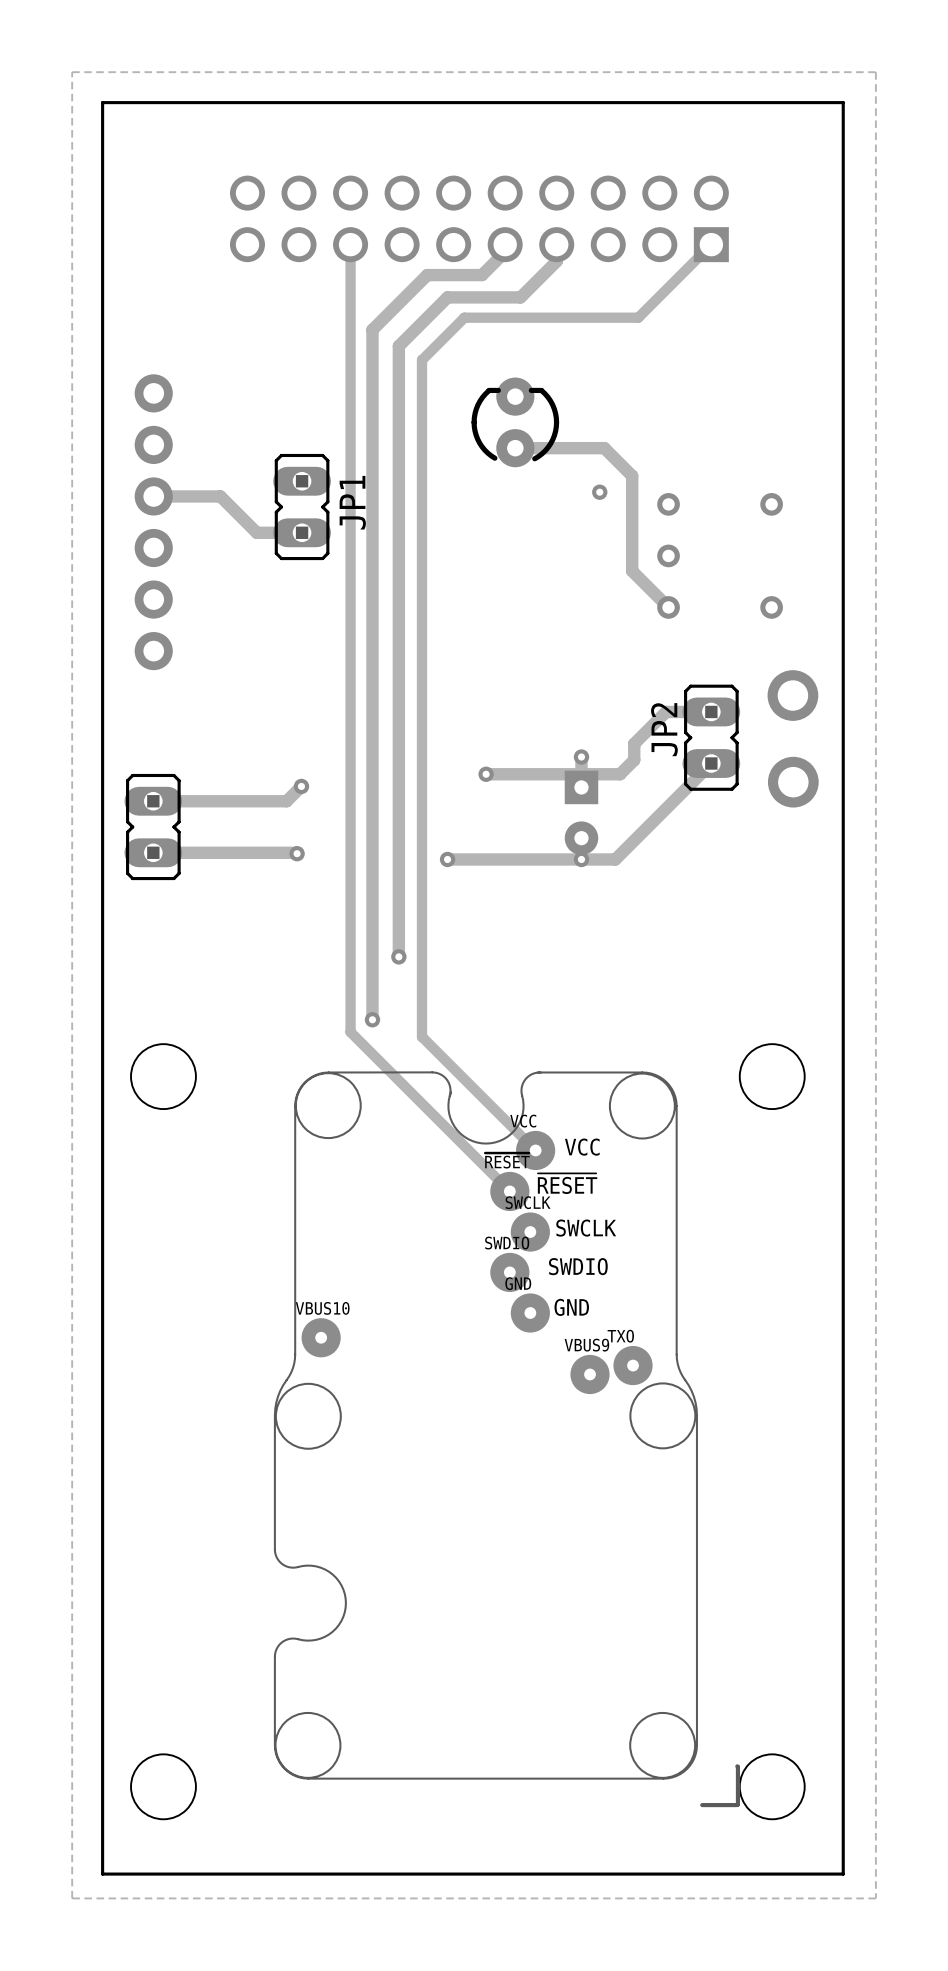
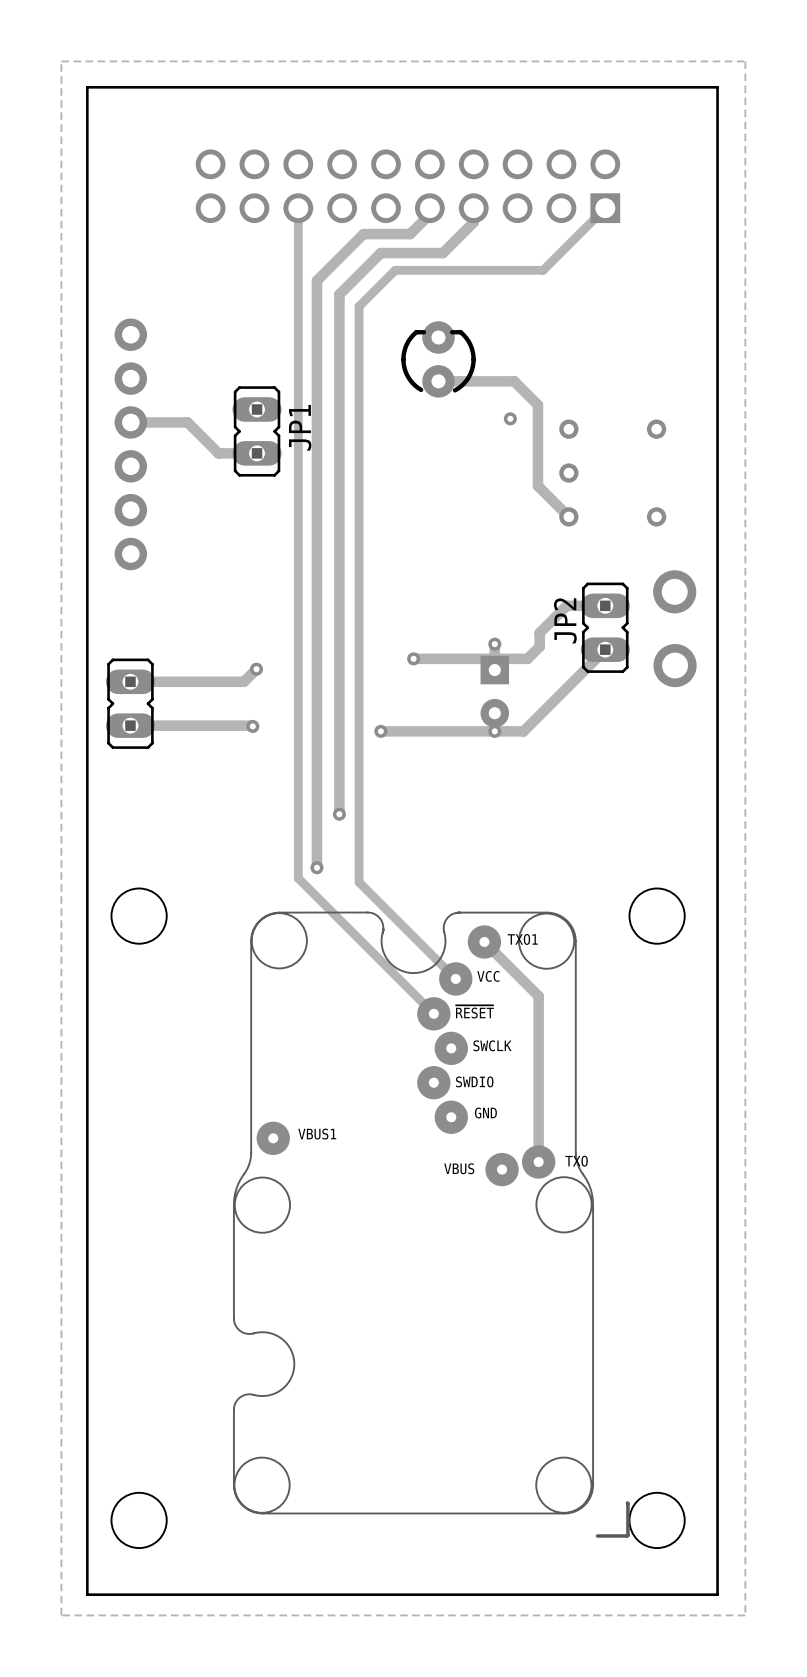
track: none -> (484, 942) (538, 996) (538, 1161)
TXO1: none -> (484, 942)
VCC name position: VCC (523, 1121) -> VCC (488, 976)
text: VCC (582, 1147) -> none
~{RESET} name position: ~{RESET} (507, 1160) -> ~{RESET} (474, 1011)
text: ~{RESET} (567, 1183) -> none
SWCLK name position: SWCLK (528, 1202) -> SWCLK (492, 1045)
text: SWCLK (586, 1228) -> none
SWDIO name position: SWDIO (507, 1243) -> SWDIO (474, 1081)
text: SWDIO (578, 1266) -> none
GND name position: GND (518, 1283) -> GND (485, 1112)
text: GND (571, 1307) -> none
VBUS10 name: VBUS10 (322, 1308) -> VBUS1 (317, 1134)
TXO name position: TXO (620, 1336) -> TXO (576, 1161)
VBUS9 name: VBUS9 (586, 1345) -> VBUS (459, 1168)

